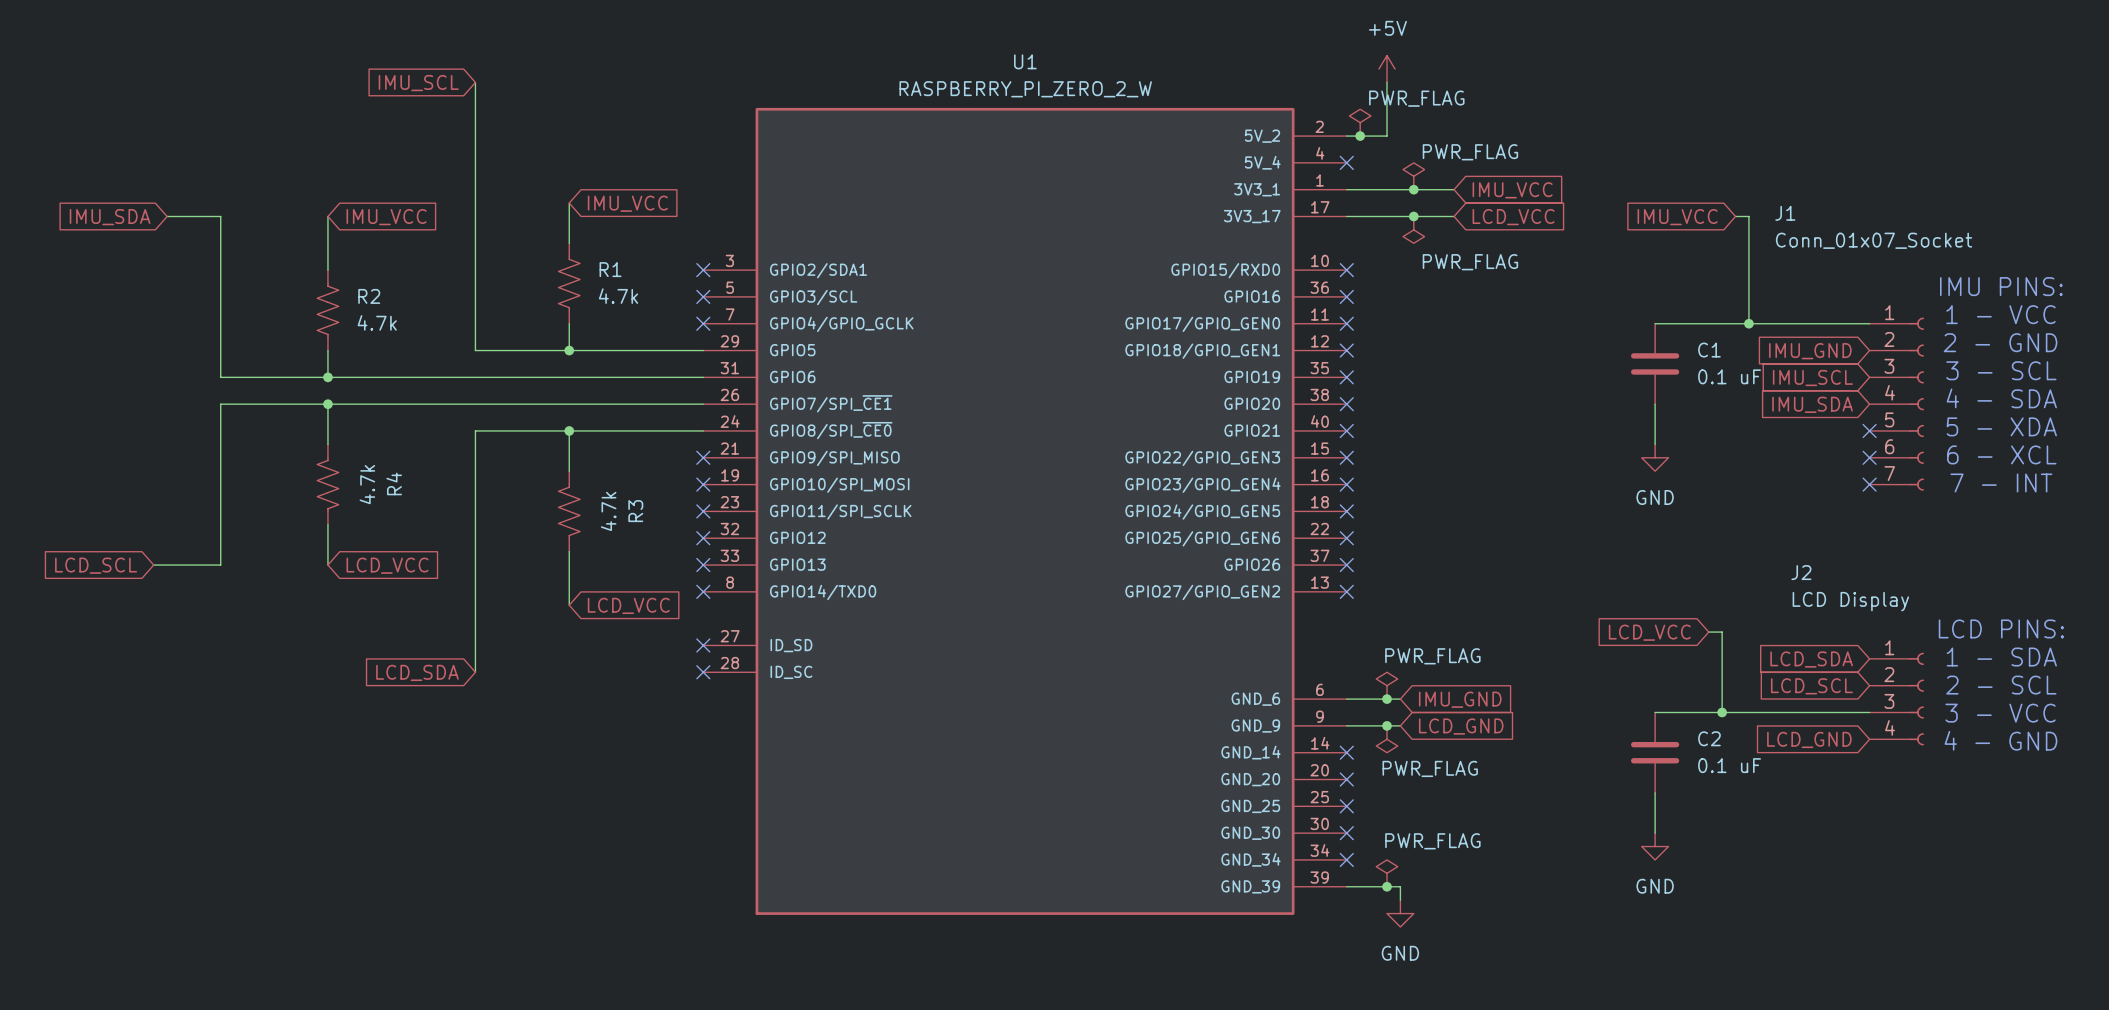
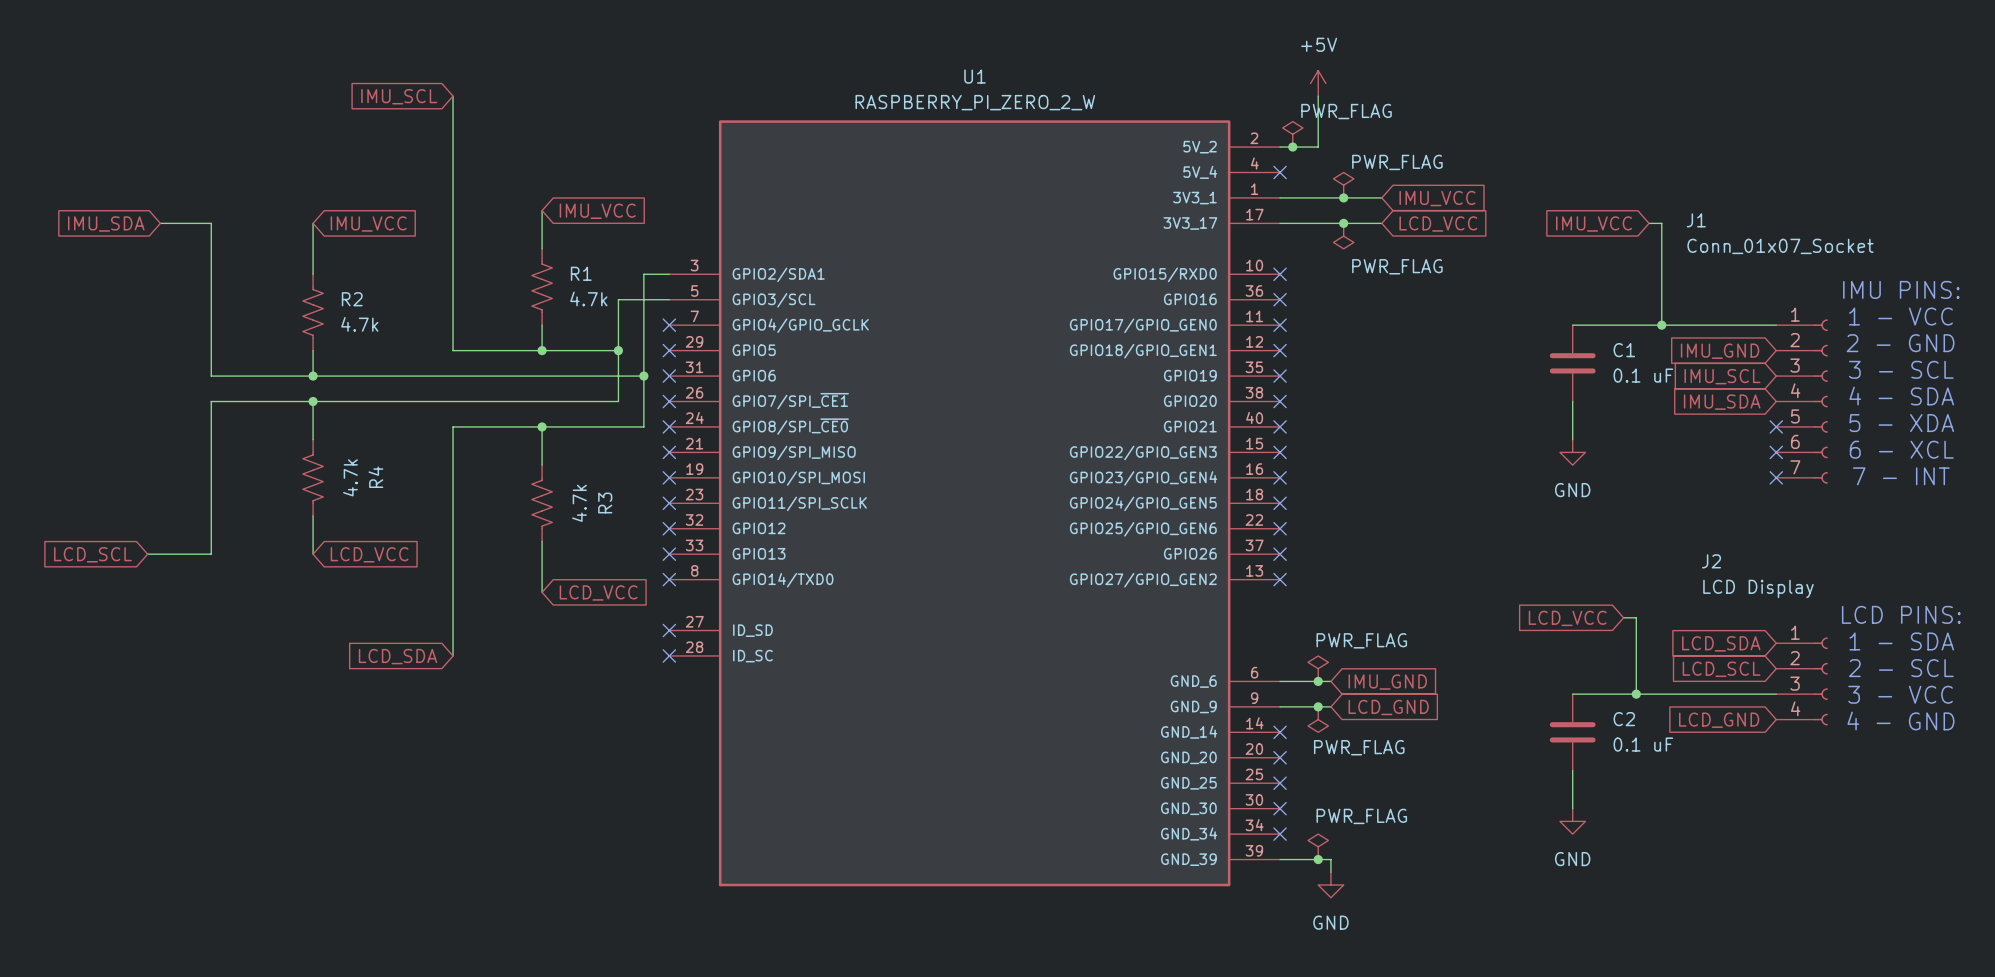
no-connect mark: (703, 270) -> none
no-connect mark: (703, 296) -> none
wire: (649, 350) (703, 350) -> none
junction: none -> (618, 350)
no-connect mark: none -> (669, 350)
wire: (676, 377) (703, 377) -> none
junction: none -> (643, 376)
no-connect mark: none -> (669, 376)
wire: (649, 404) (703, 404) -> (618, 401) (618, 299) (669, 299)
no-connect mark: none -> (669, 401)
wire: (676, 430) (703, 430) -> (643, 426) (643, 274) (669, 274)
no-connect mark: none -> (669, 426)

